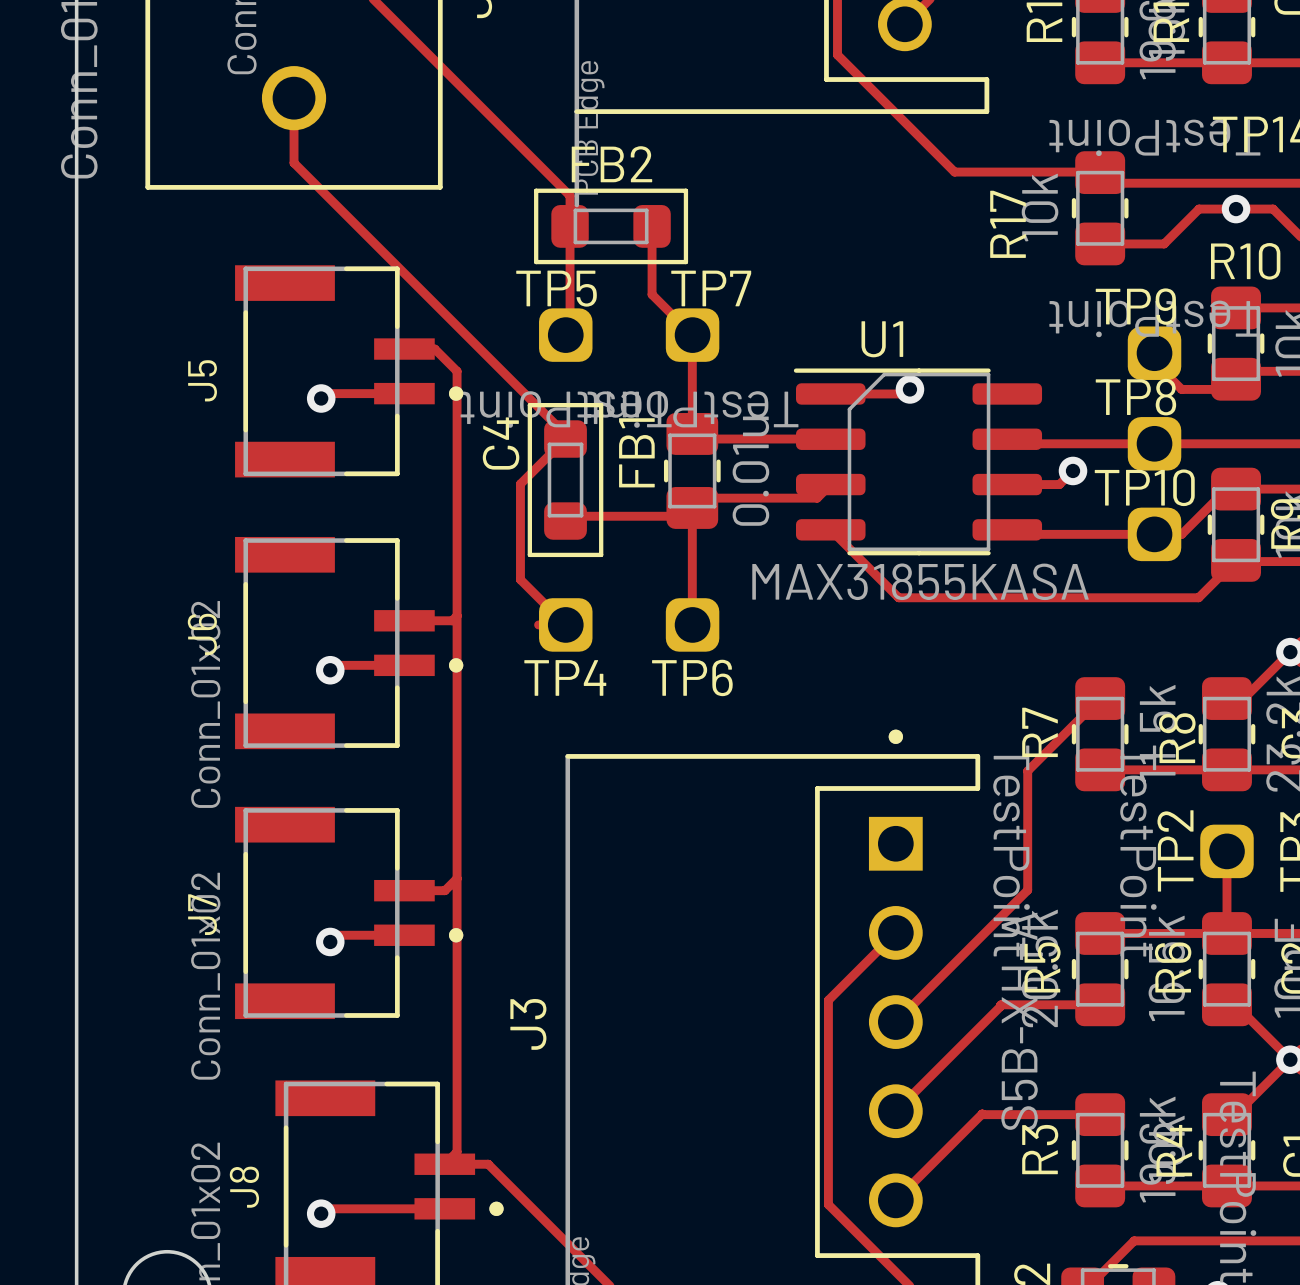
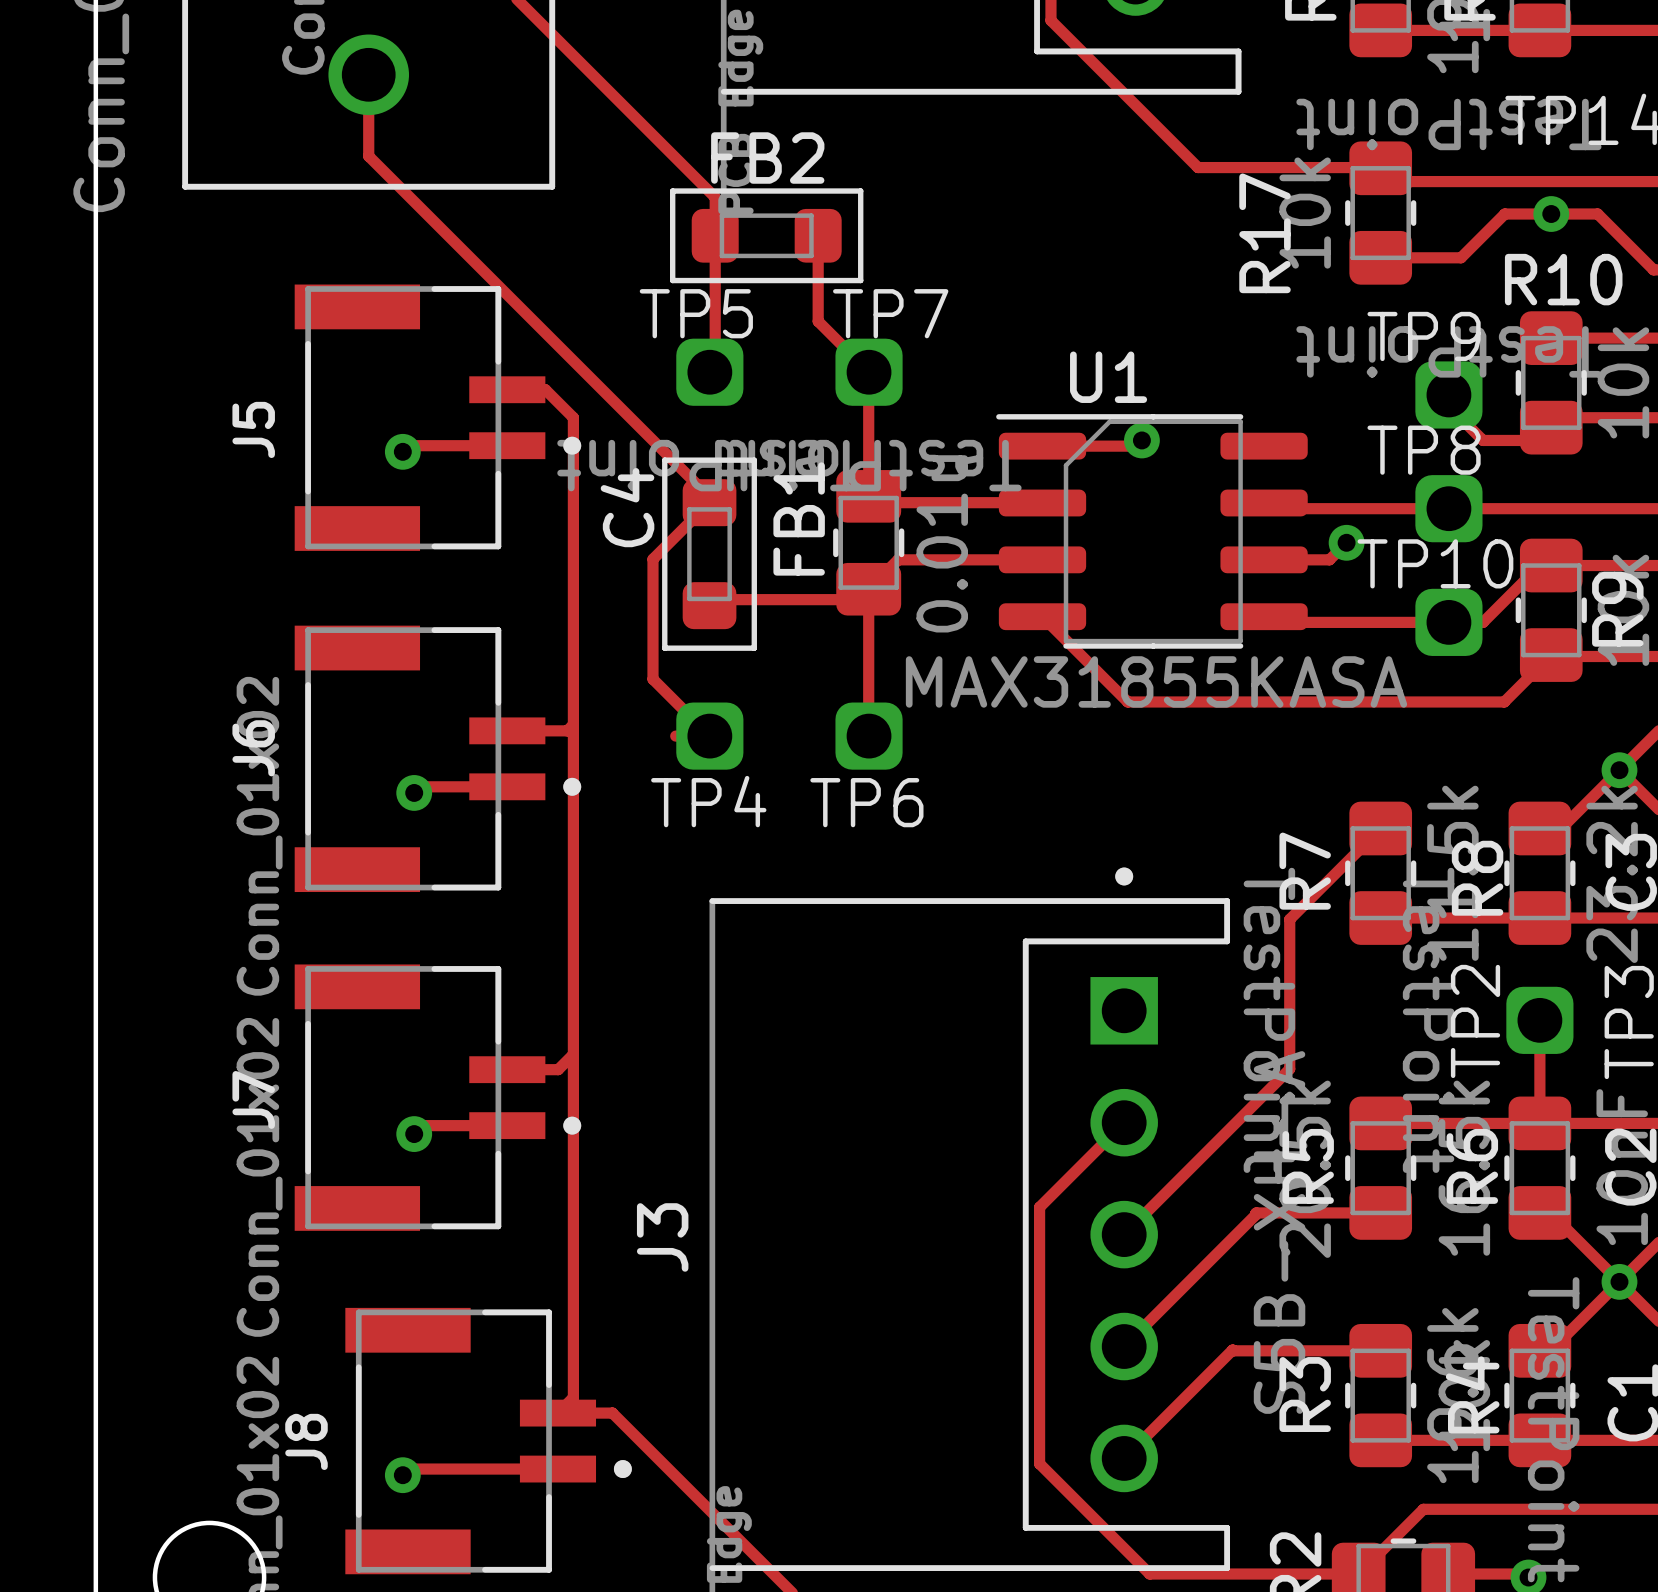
track: (830, 484) (817, 498) (702, 498) -> (1042, 559) (898, 559) (881, 576)

